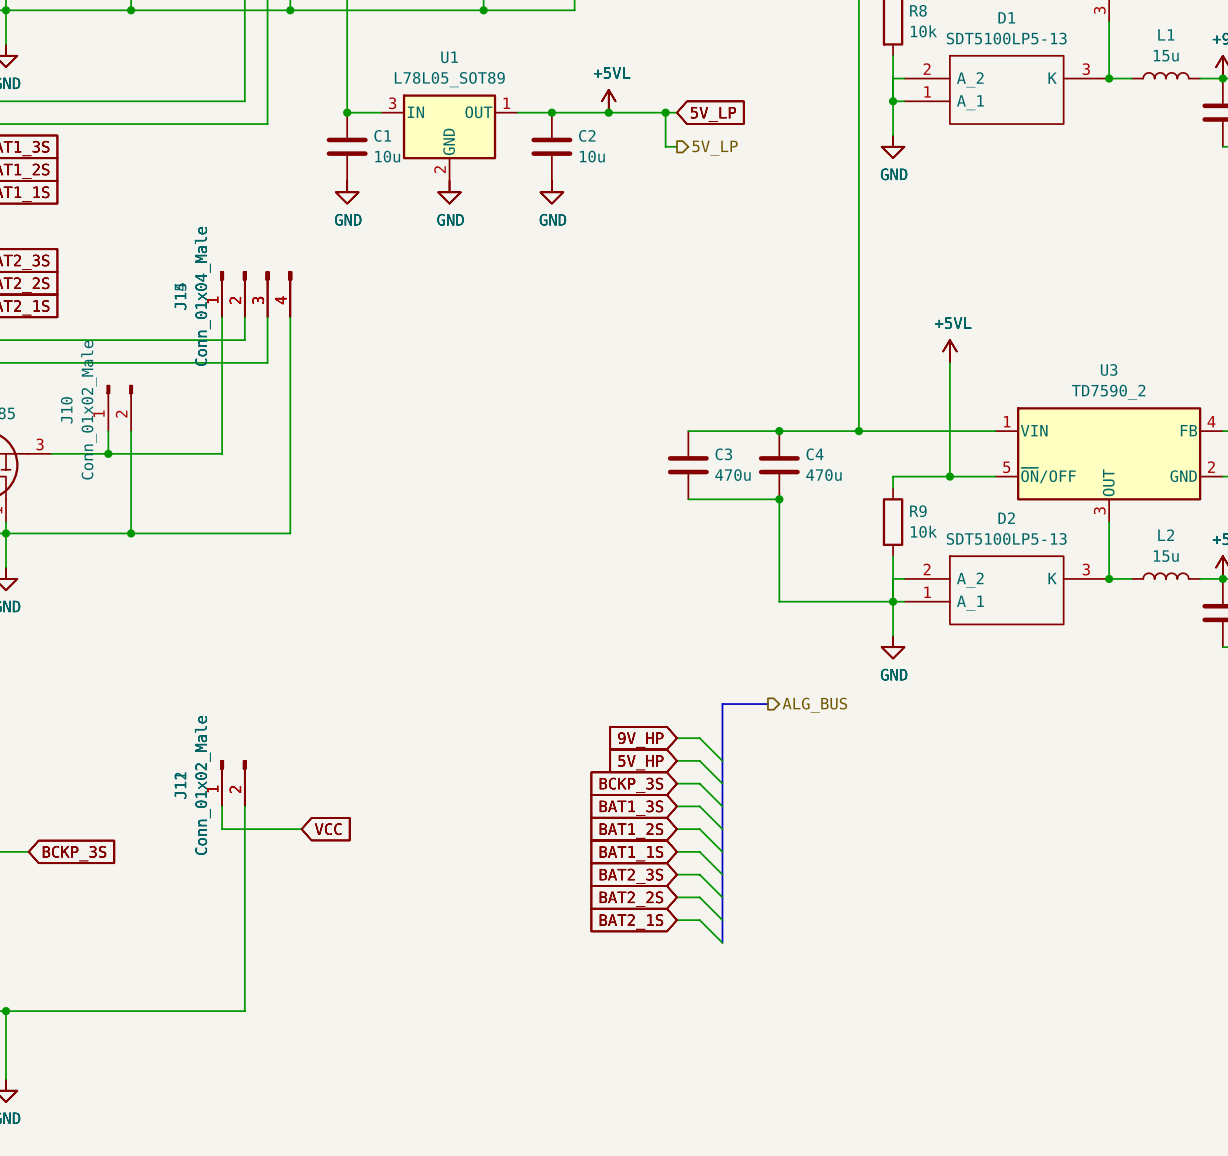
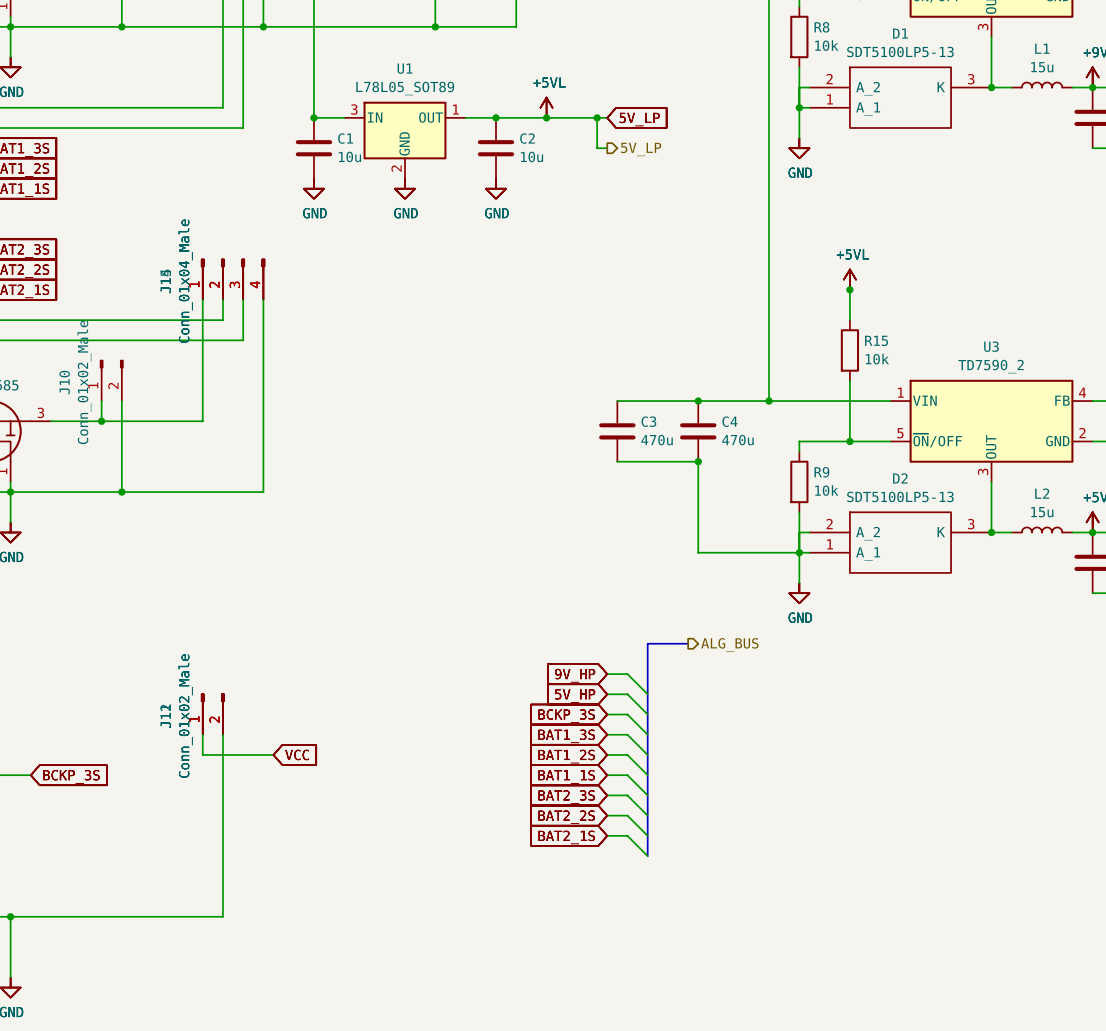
wire: none -> (849, 289) (849, 320)
junction: none -> (849, 289)
power symbol position: +5VL (949, 351) -> +5VL (849, 279)
wire: (949, 362) (949, 408) -> none
R15: none -> 10k (849, 350)

